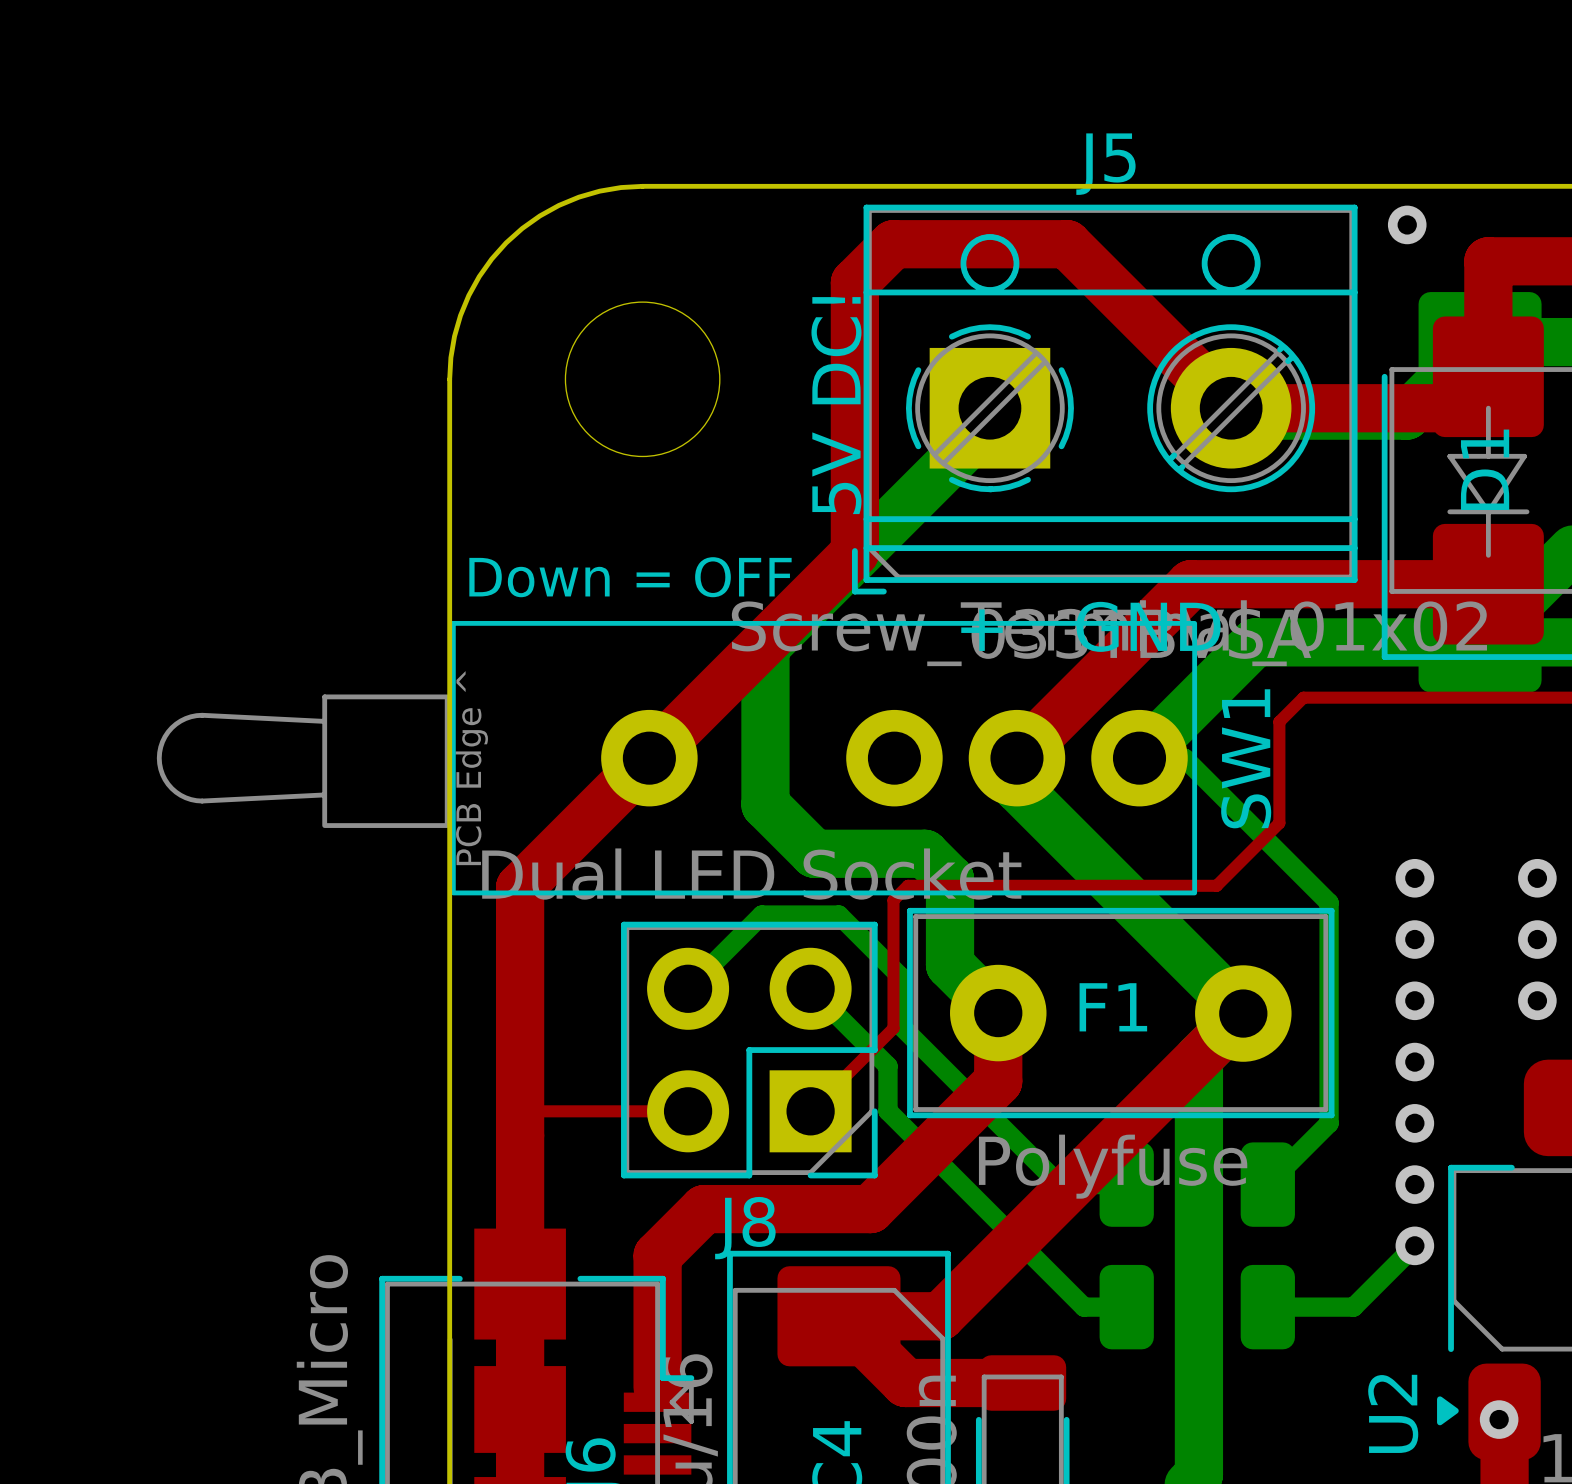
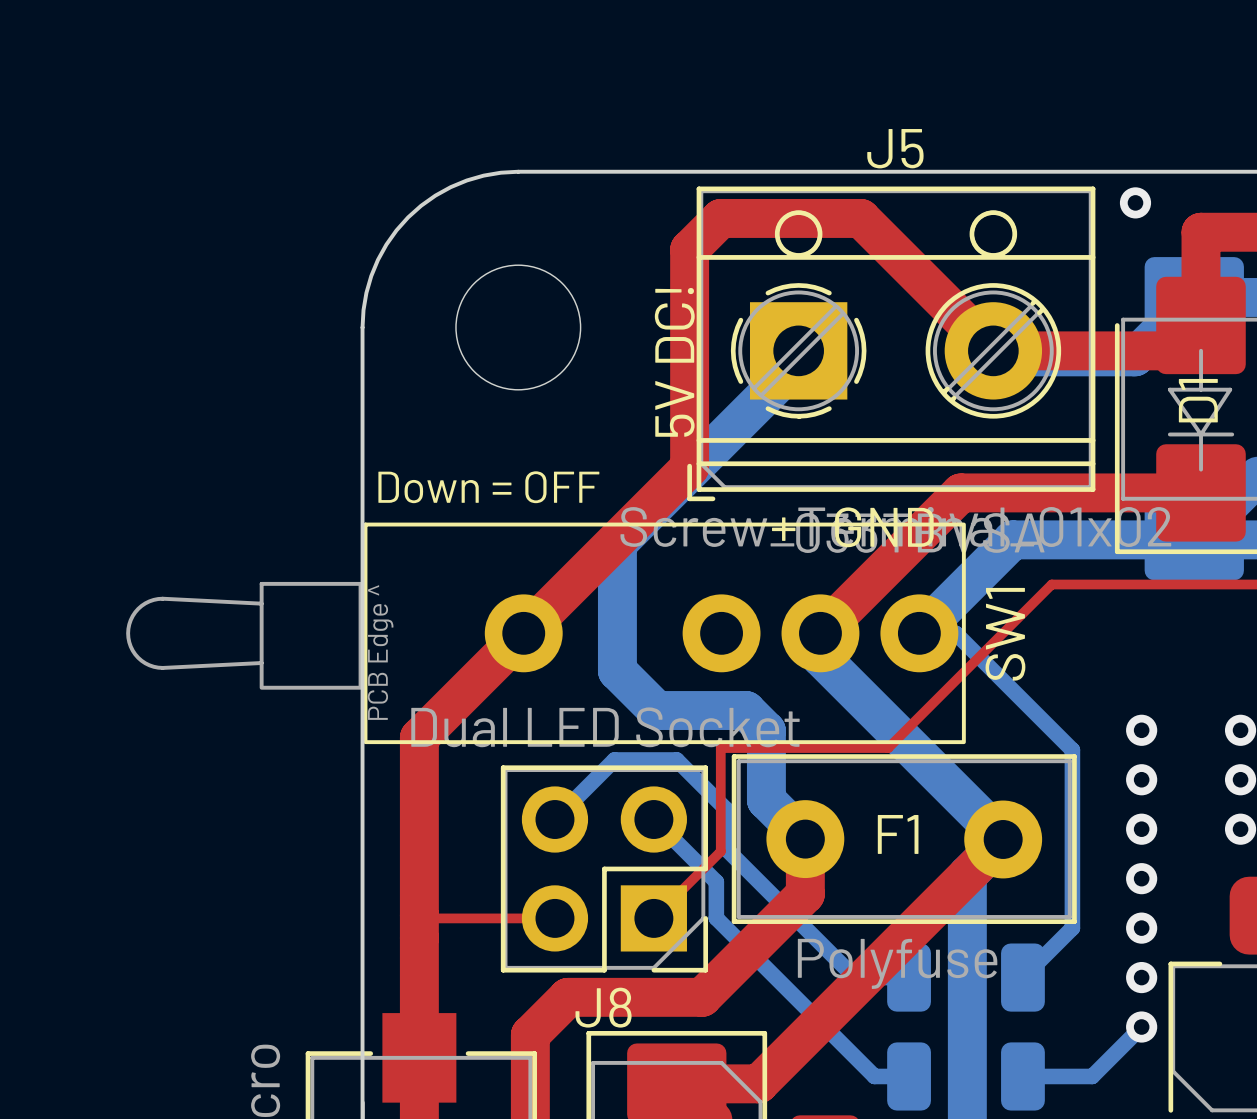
top track: (1279, 721) (1279, 823) (1216, 885) (907, 885) (893, 900) -> (1032, 603) (888, 748) (720, 748)

